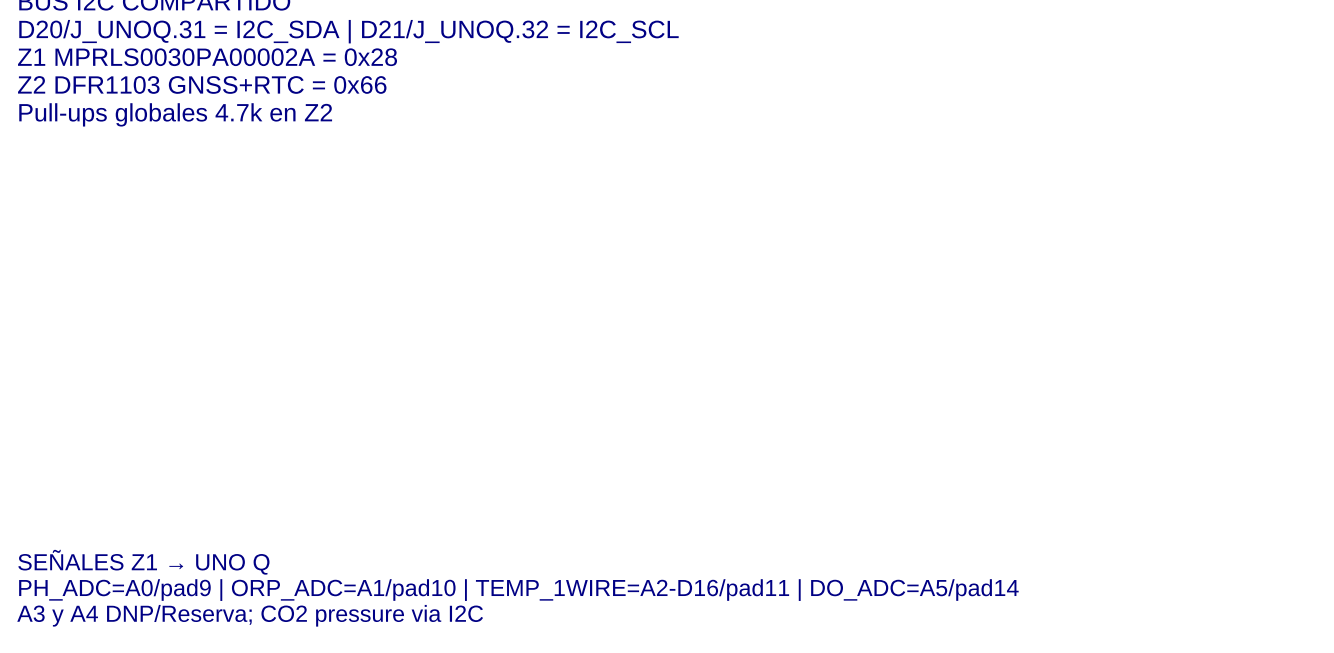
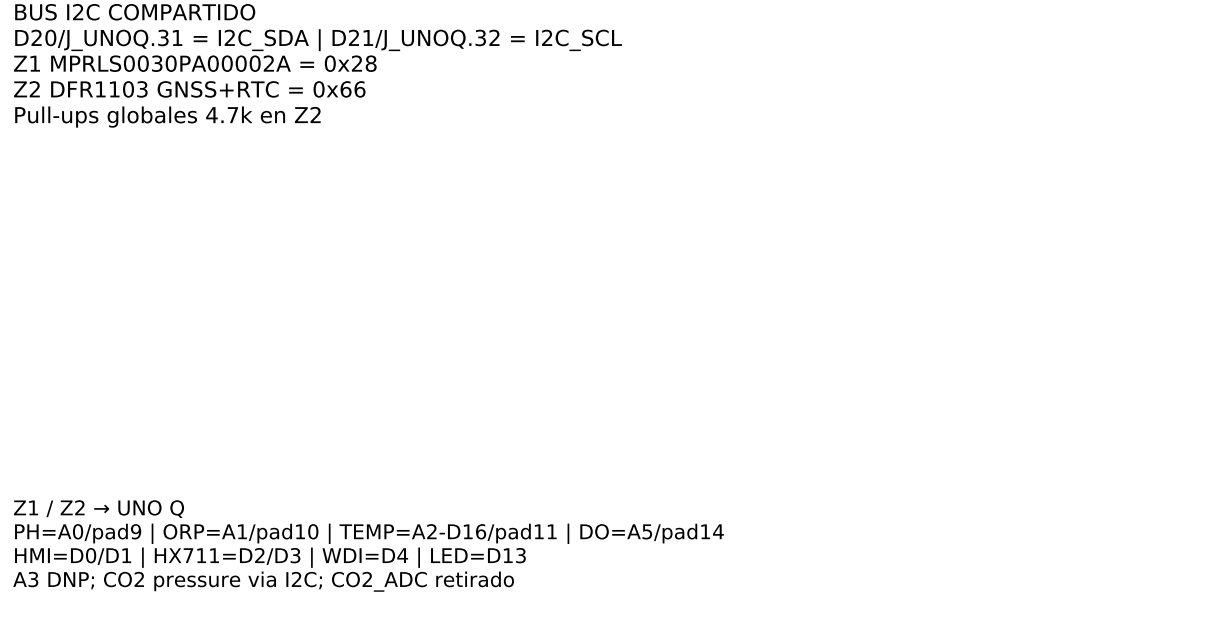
text: none -> Z1 / Z2 → UNO Q (99, 509)
text: SEÑALES Z1 → UNO Q (143, 562) -> PH=A0/pad9 | ORP=A1/pad10 | TEMP=A2-D16/pad11 | DO=A5/pad14 (369, 533)
text: PH_ADC=A0/pad9 | ORP_ADC=A1/pad10 | TEMP_1WIRE=A2-D16/pad11 | DO_ADC=A5/pad14 (518, 590) -> HMI=D0/D1 | HX711=D2/D3 | WDI=D4 | LED=D13 (270, 557)
text: A3 y A4 DNP/Reserva; CO2 pressure via I2C (250, 615) -> A3 DNP; CO2 pressure via I2C; CO2_ADC retirado (263, 581)

